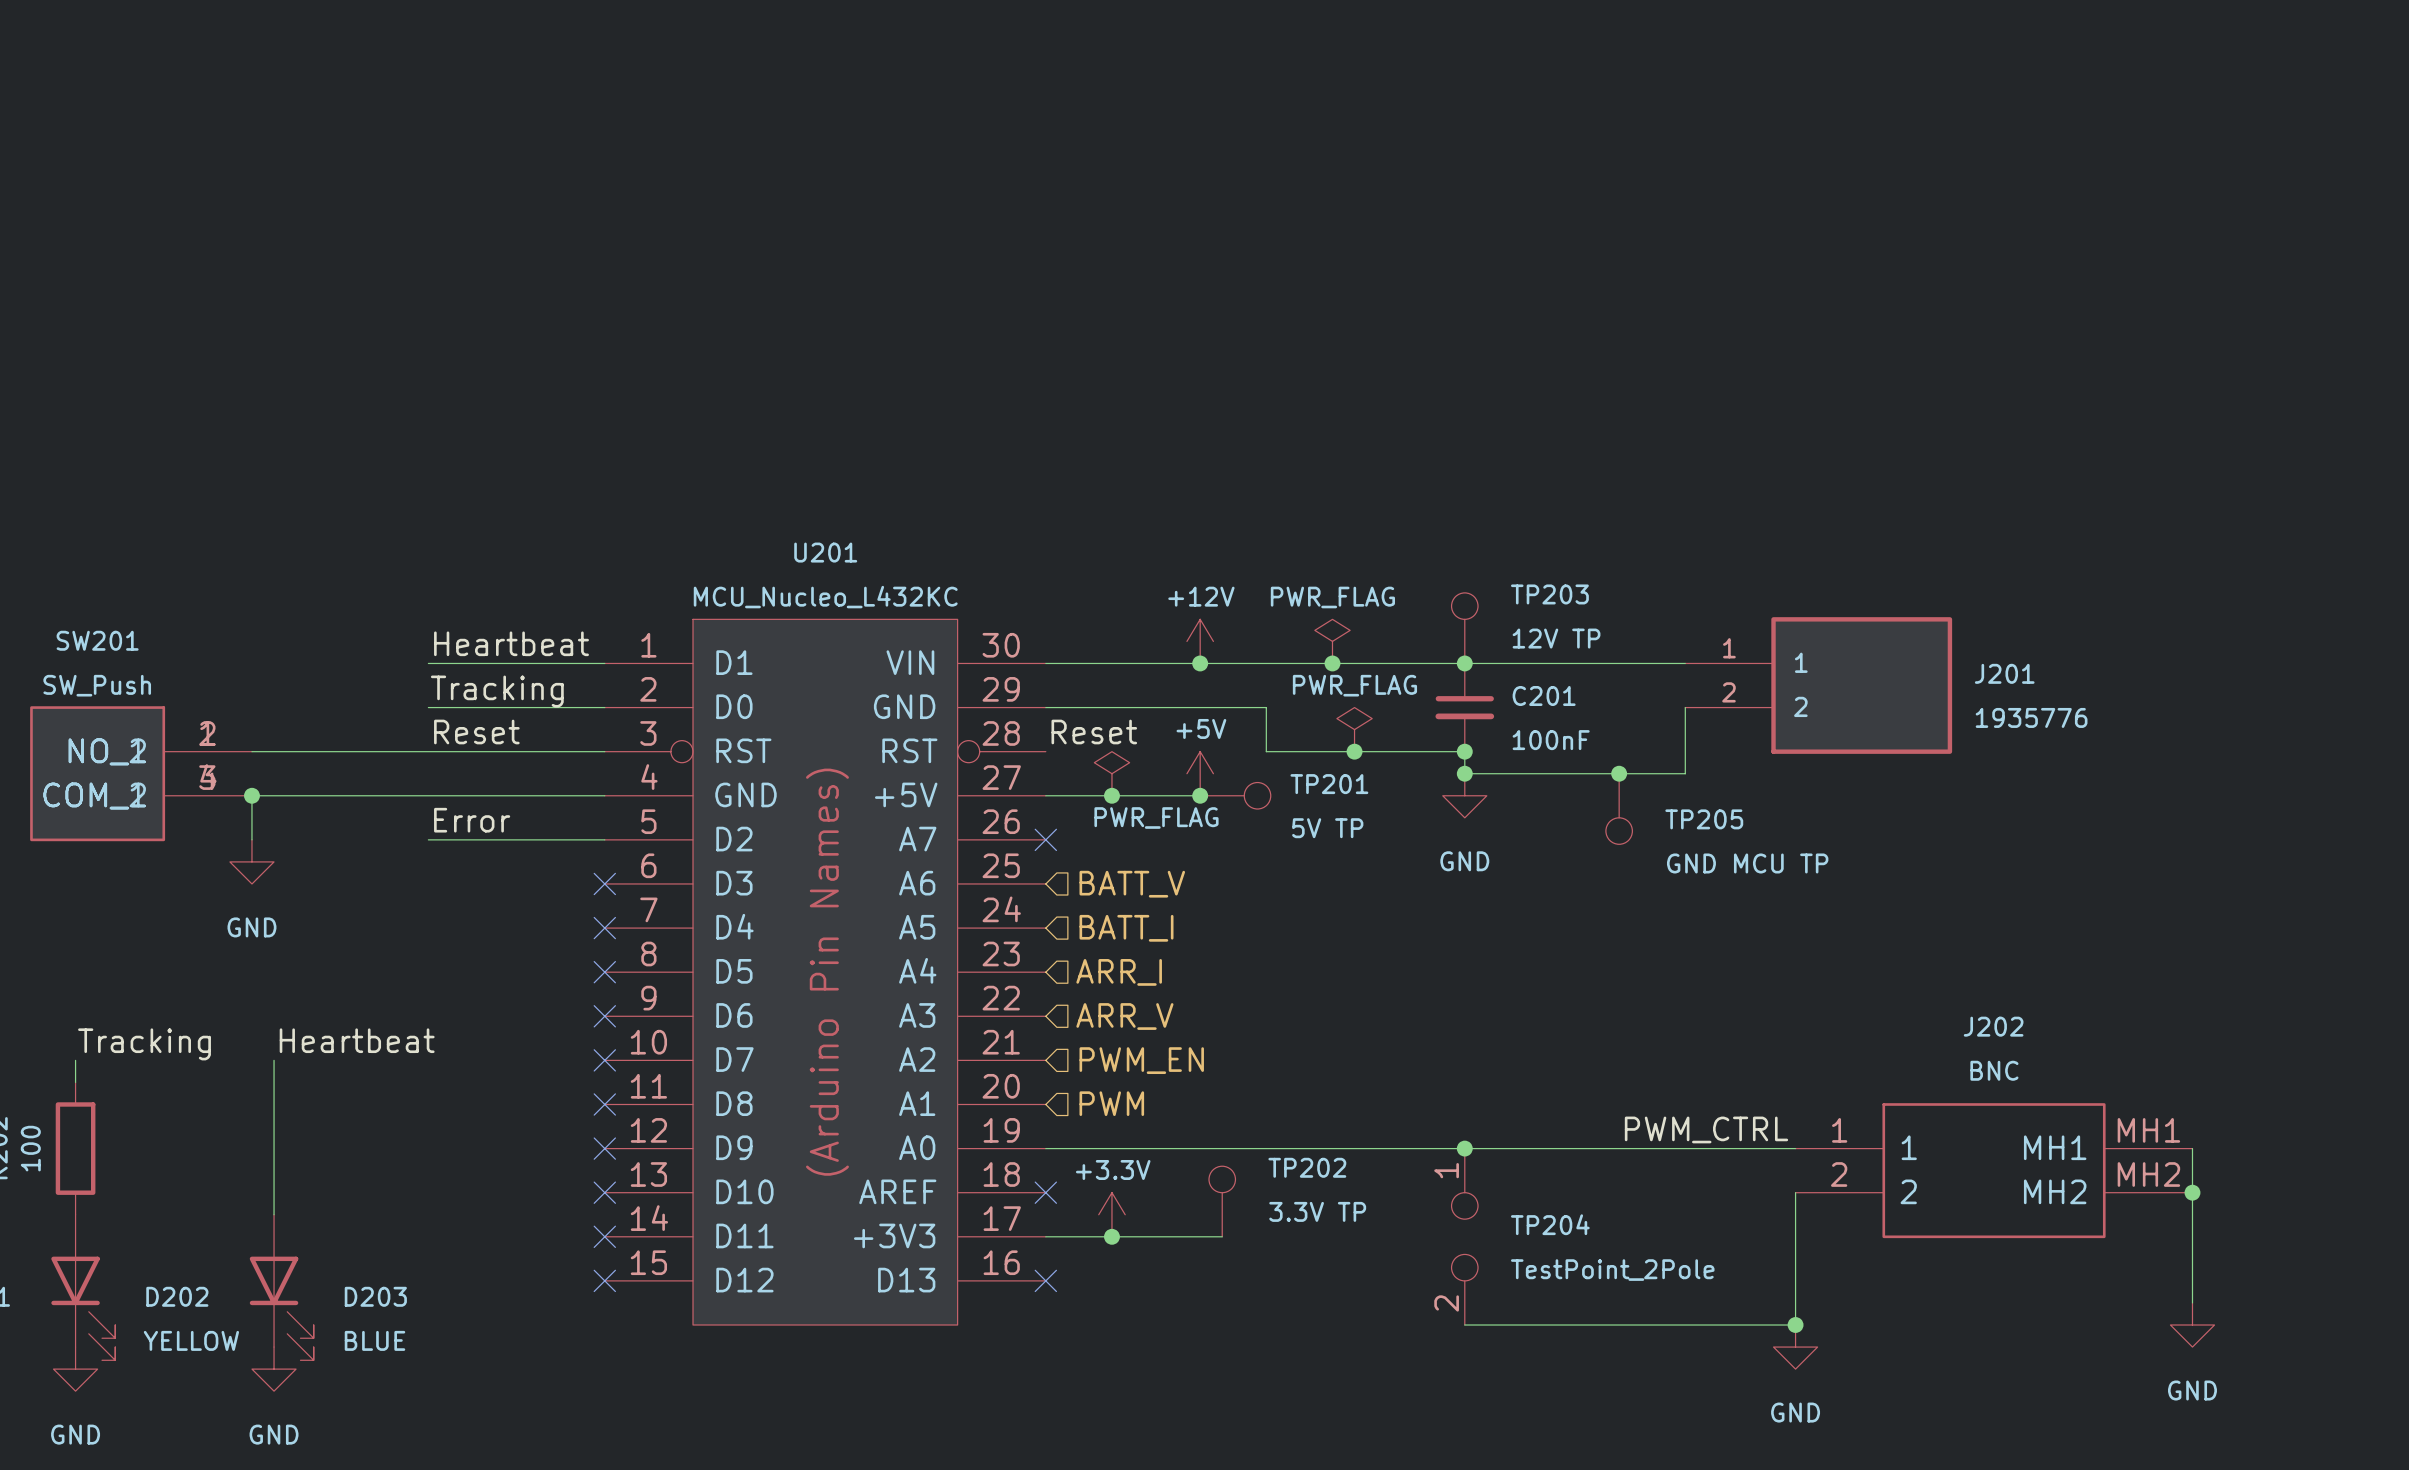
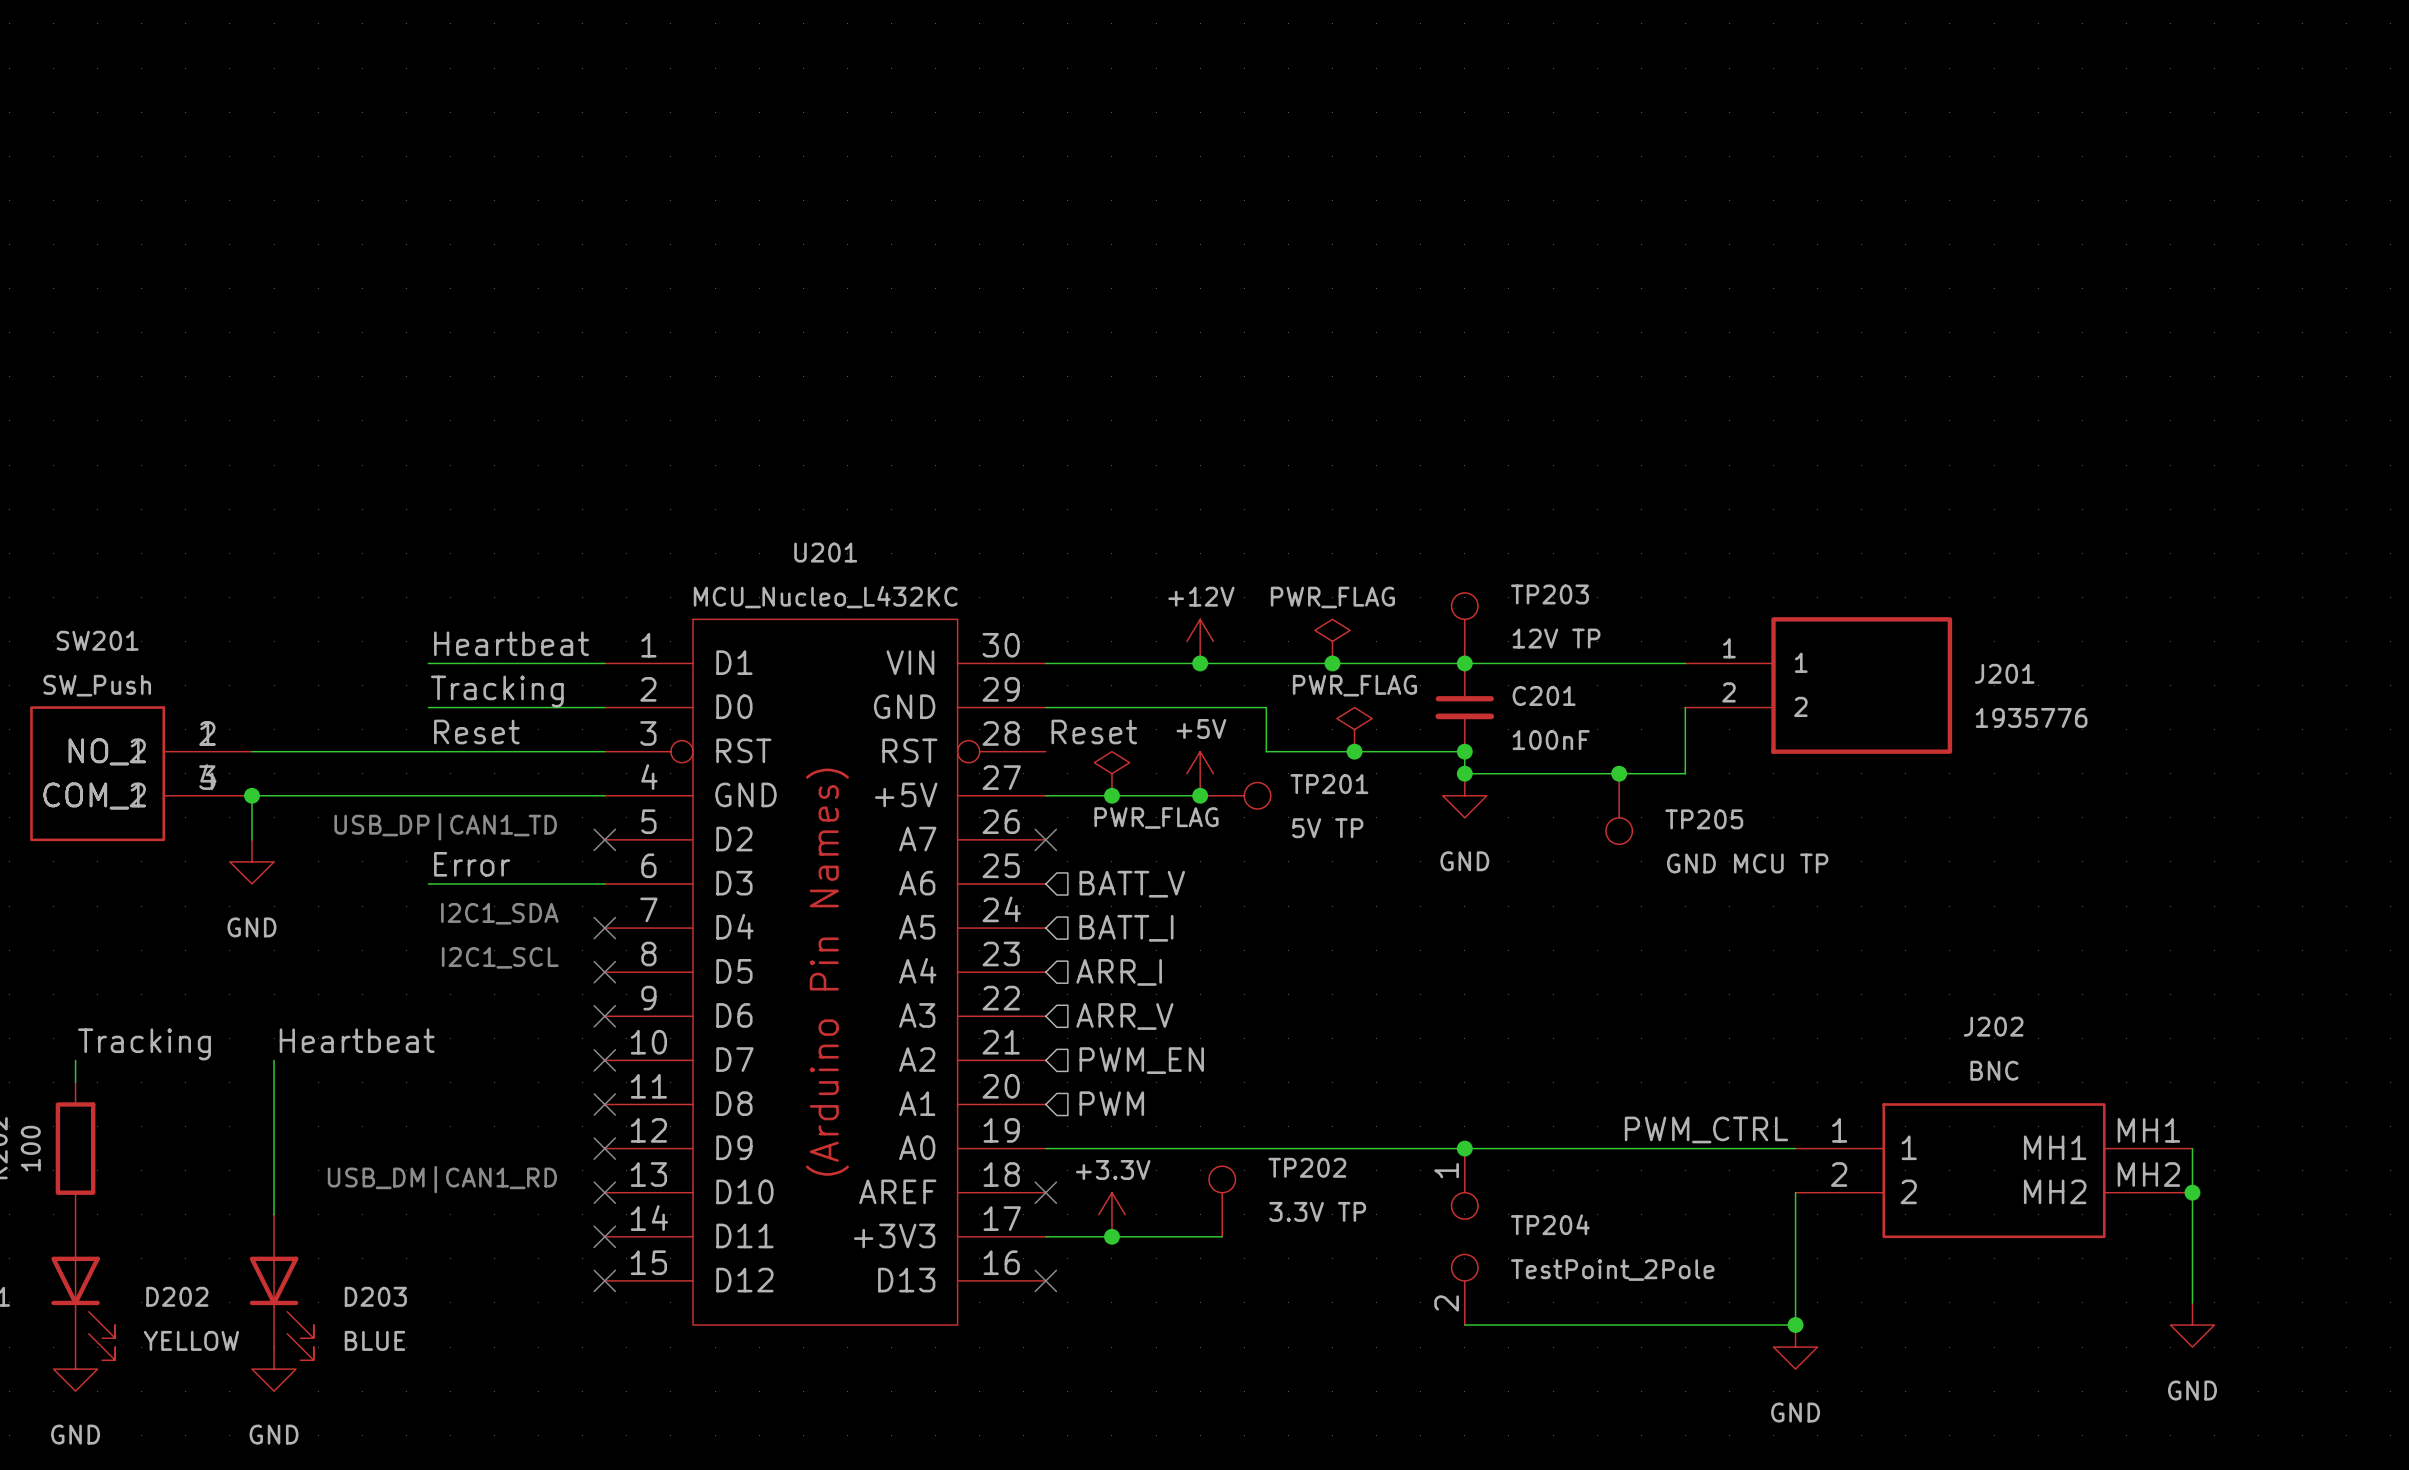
label position: Error (472, 820) -> Error (472, 864)
text: none -> USB_DP|CAN1_TD (445, 826)
wire: (428, 839) (604, 839) -> (428, 883) (604, 883)
no-connect mark position: (604, 883) -> (604, 839)
text: none -> I2C1_SDA (499, 913)
text: none -> I2C1_SCL (500, 957)
text: none -> USB_DM|CAN1_RD (442, 1179)

